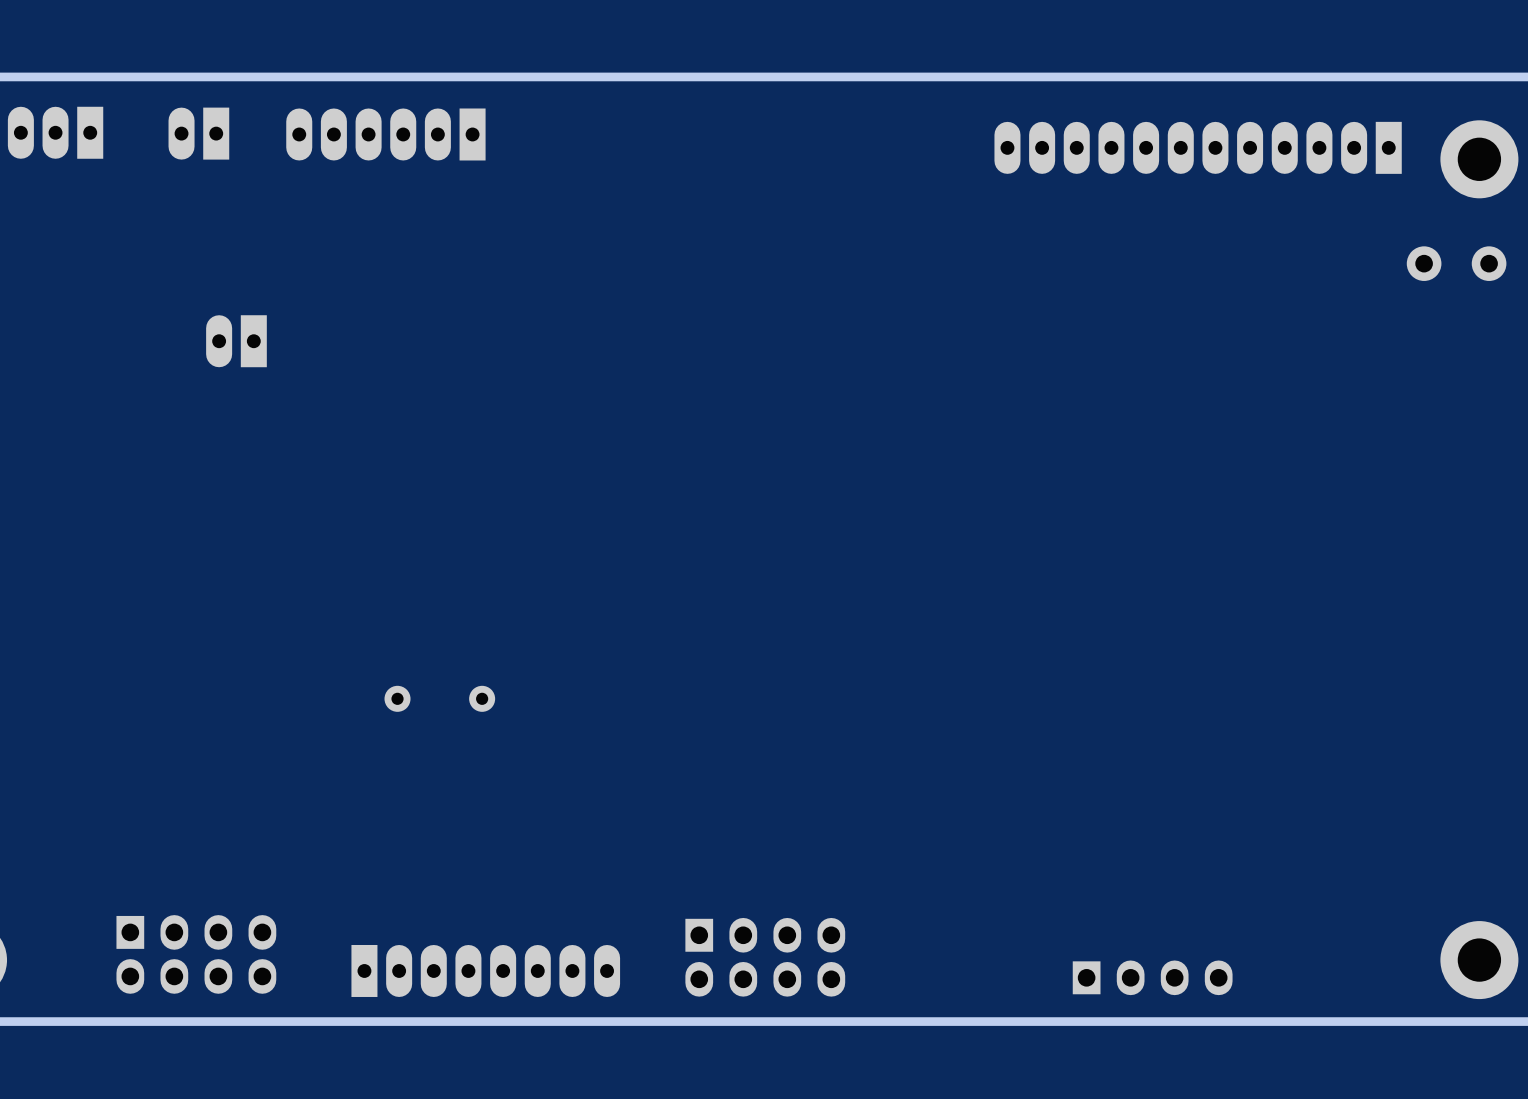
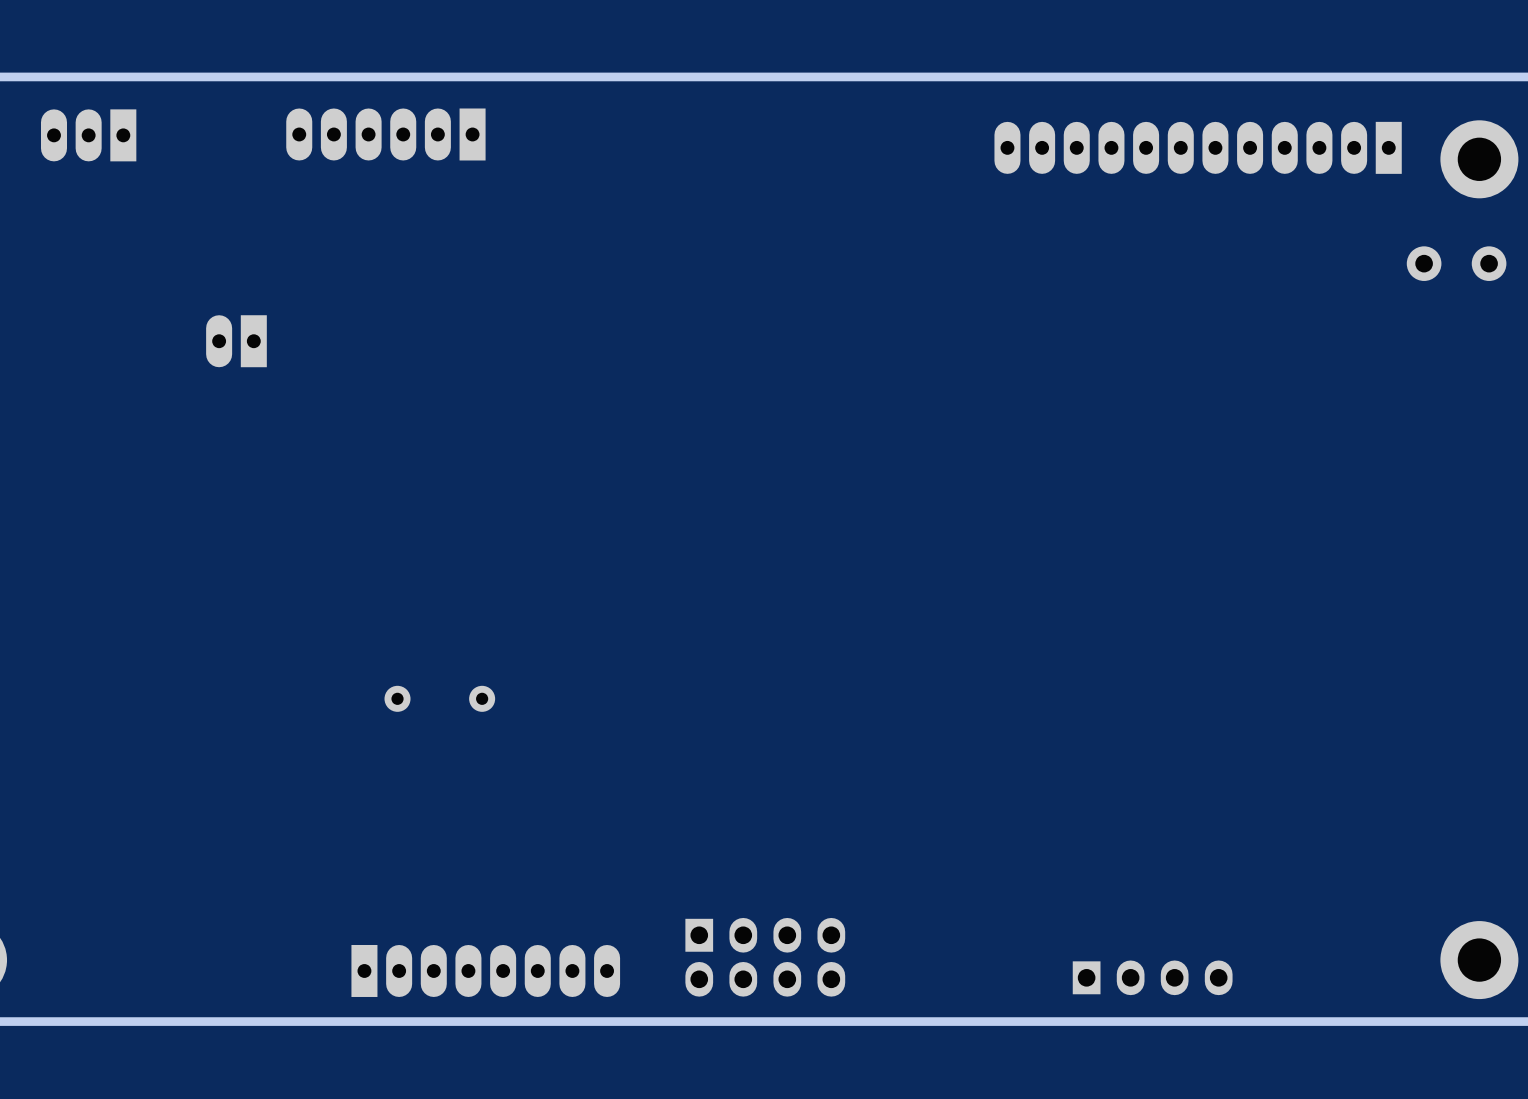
part position: (55, 132) -> (88, 135)
part: (198, 133) -> none
part: (196, 954) -> none

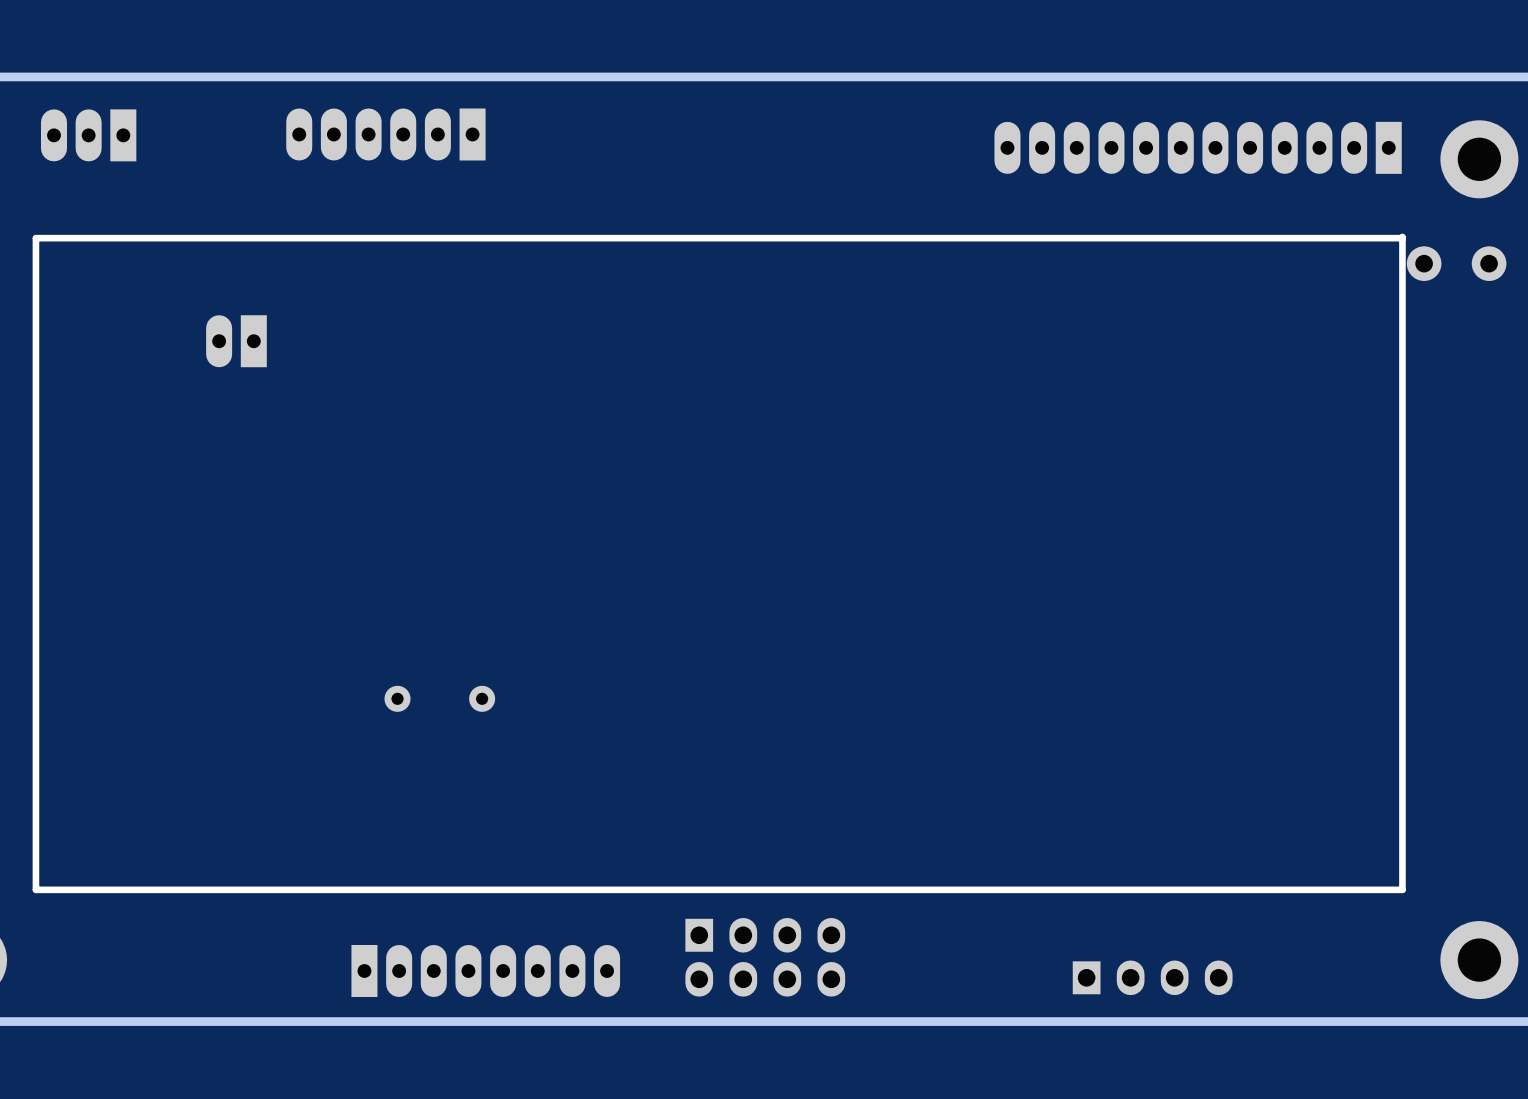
line: none -> (1402, 236) (1402, 889) (35, 889) (35, 238) (1402, 238)

